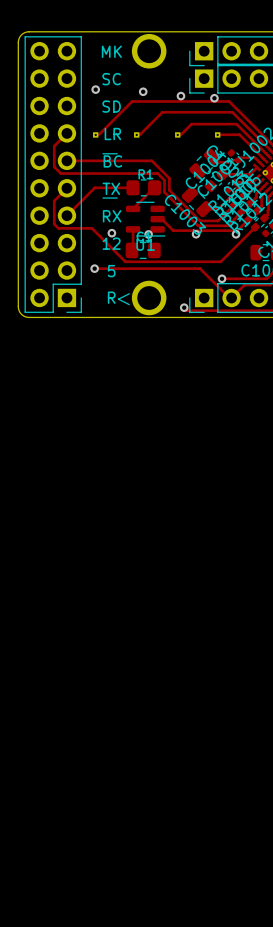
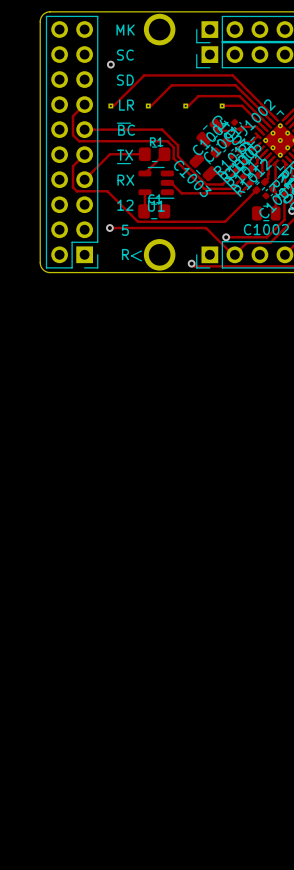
via: (143, 91) -> none
via: (180, 96) -> none
via: (214, 98) -> none
via: (111, 233) -> none
via: (148, 234) -> none
via: (196, 234) -> none
via: (236, 234) -> none

